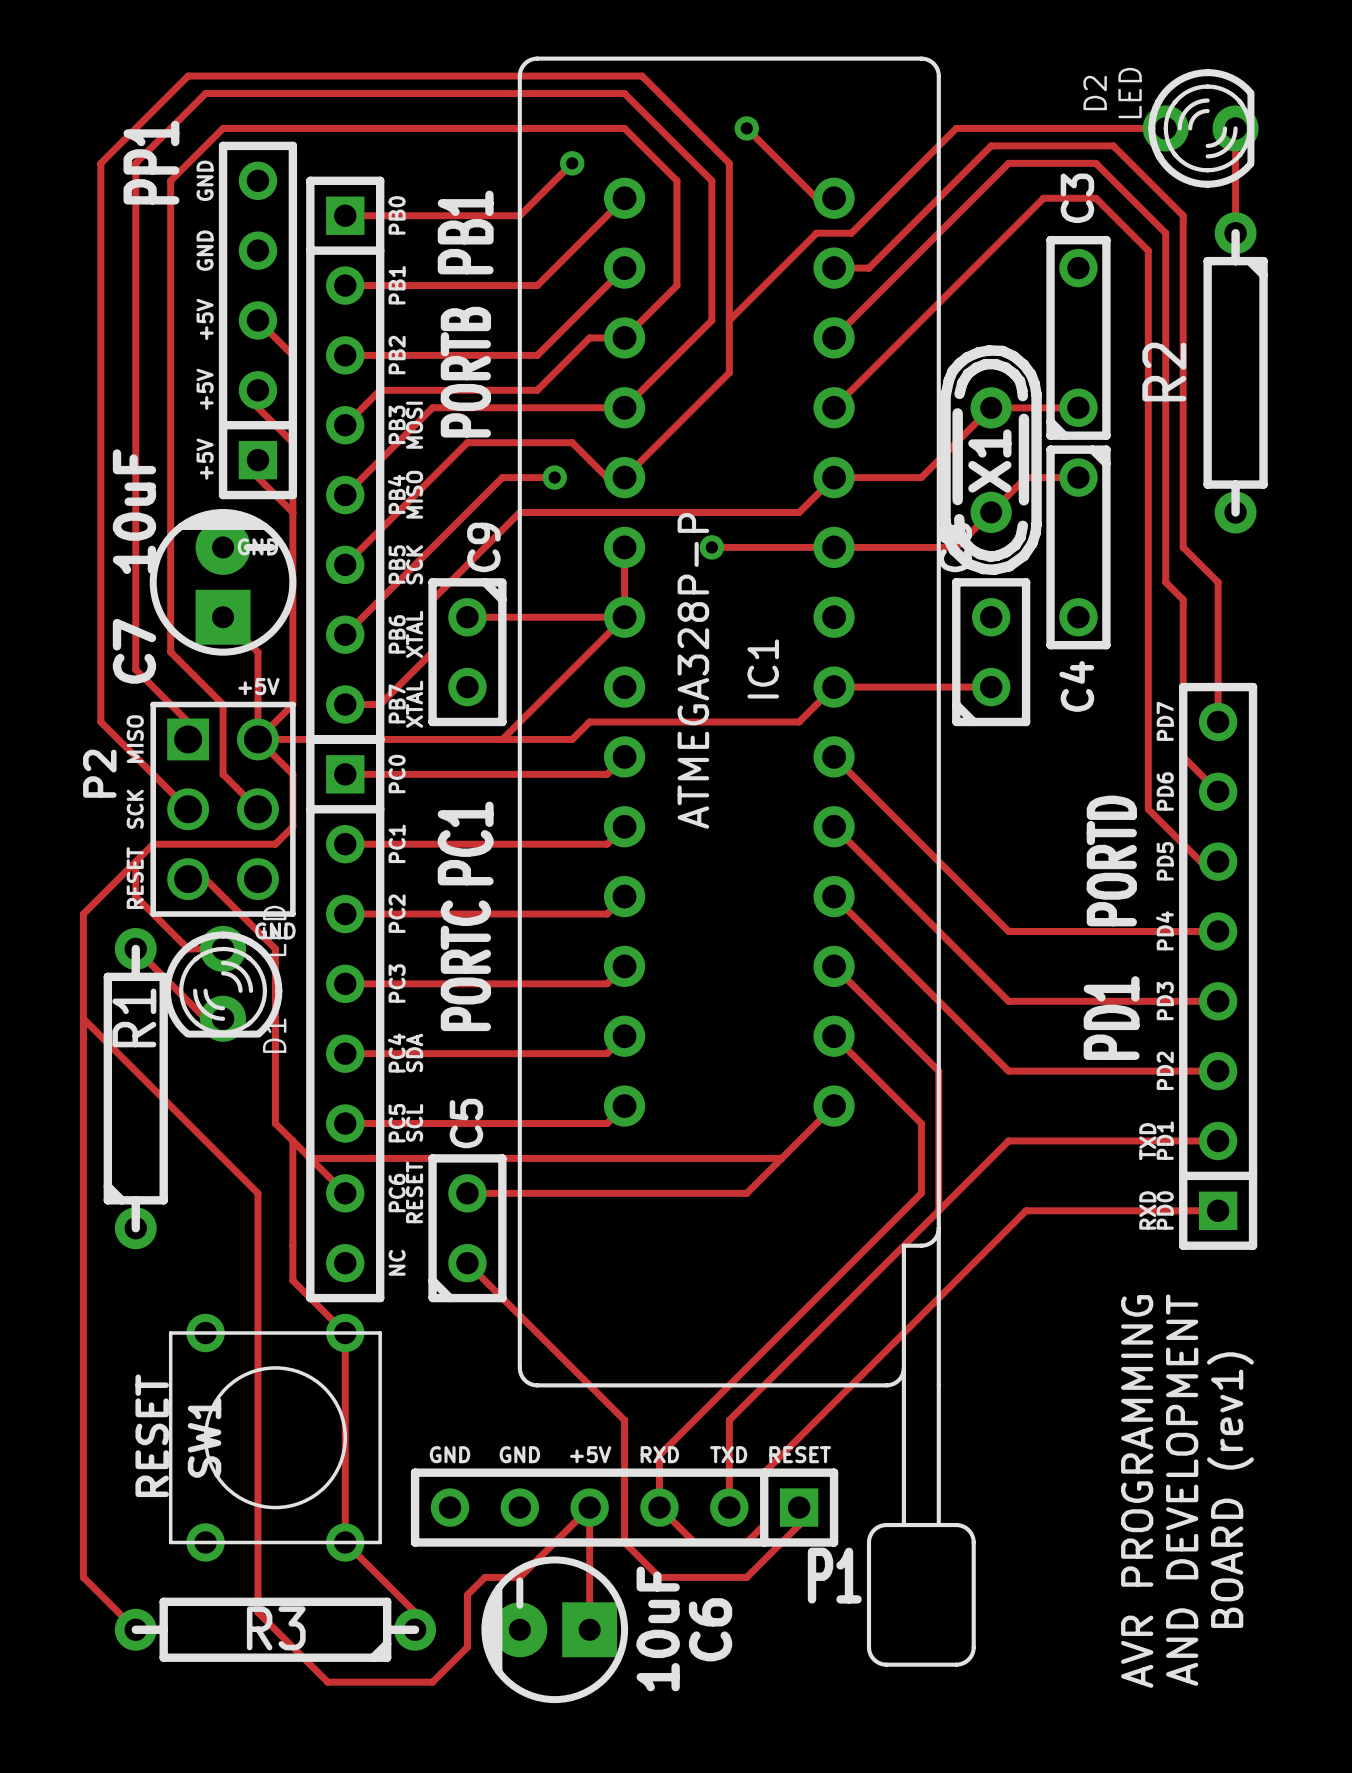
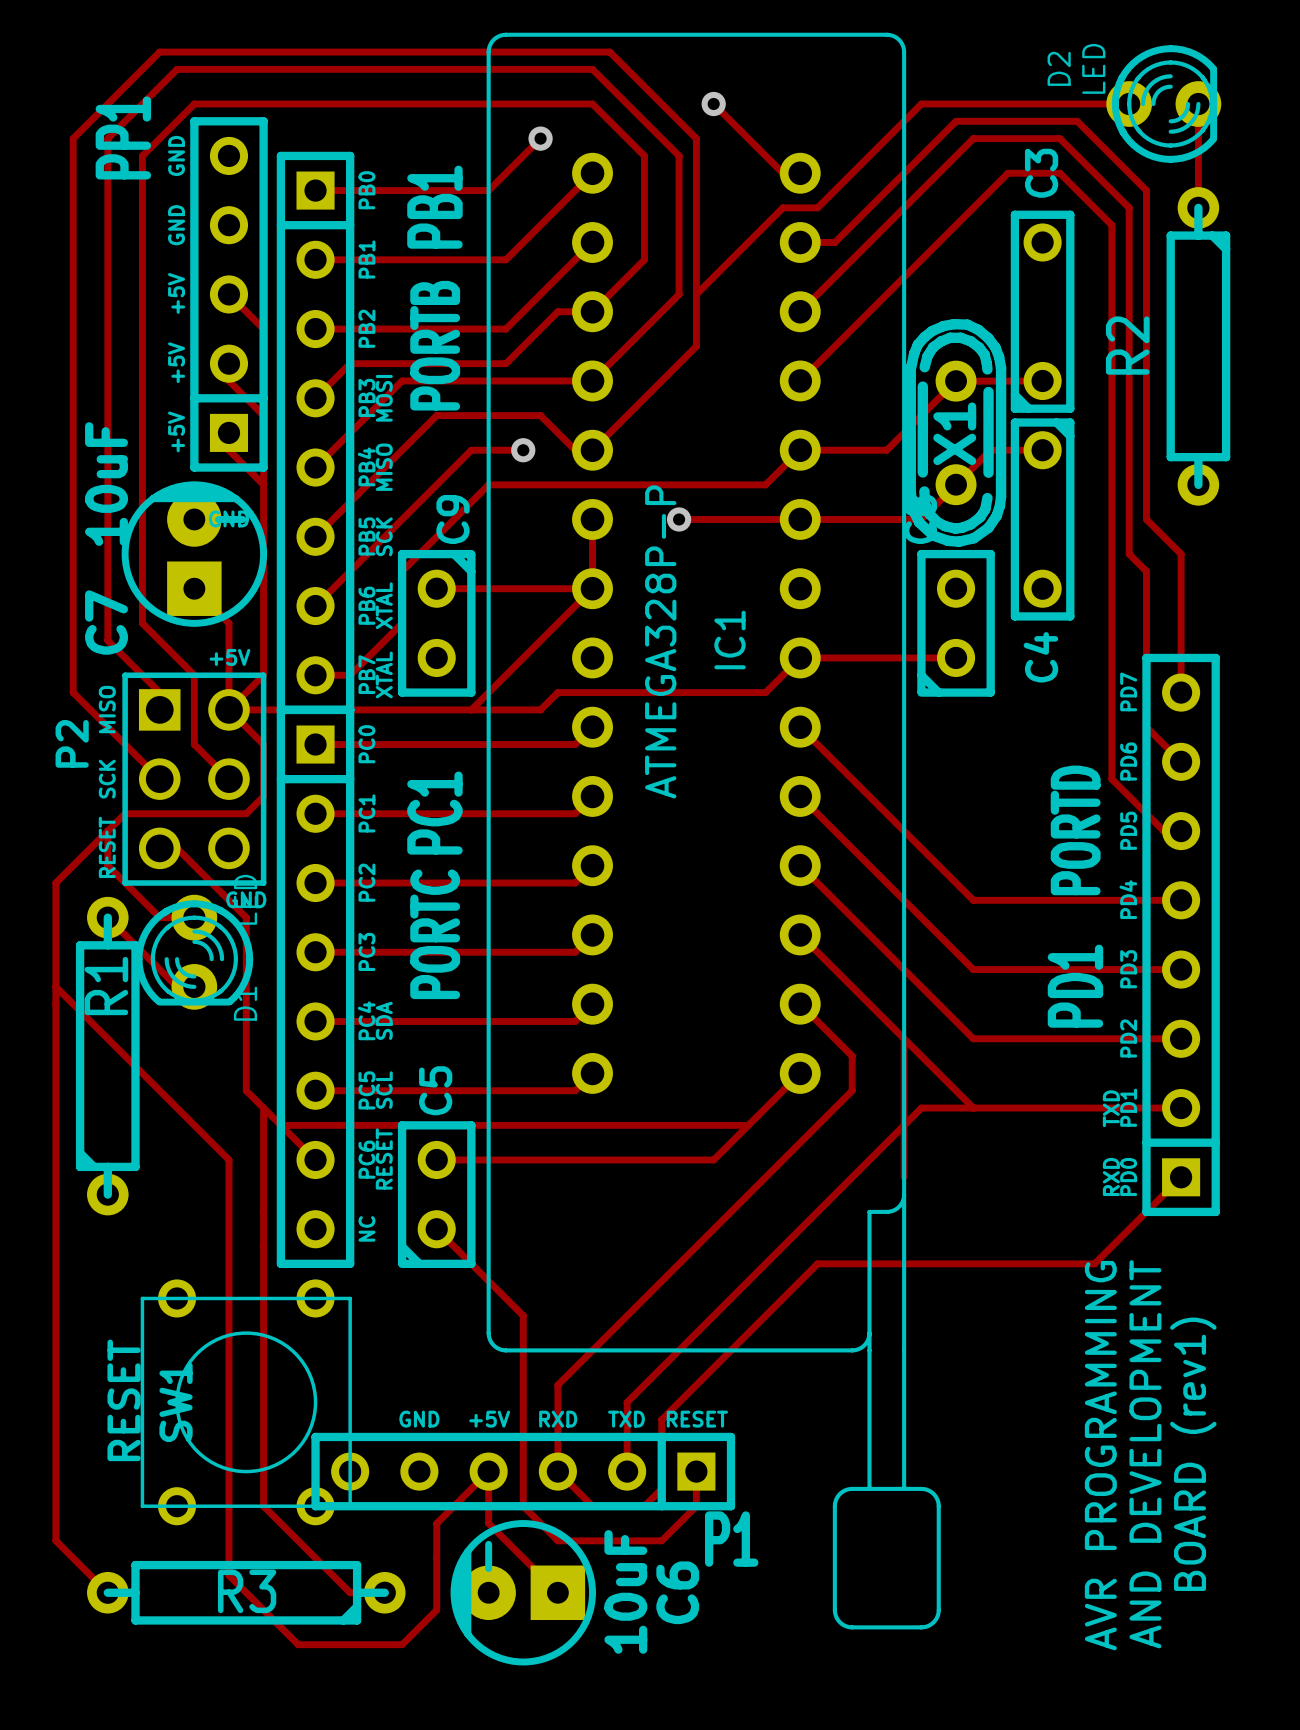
track: (886, 1088) (921, 1123) (921, 1193) (659, 1455) -> (904, 1038) (973, 1108) (921, 1108) (627, 1402) (627, 1419)
track: (1008, 1140) (851, 1298) -> (1181, 1177) (1094, 1263) (817, 1263)
track: (1218, 1210) (1026, 1210) (764, 1472) (764, 1525) (746, 1542) (694, 1542) (659, 1507) -> none
track: (292, 1280) (345, 1333) (345, 1542) (415, 1612) (415, 1629) -> (263, 1246) (263, 1506) (350, 1592) (384, 1592)
track: (554, 1350) (624, 1420) (624, 1542) (659, 1577) -> (523, 1315) (523, 1506) (557, 1540) (627, 1540)
track: (729, 1420) (729, 1507) -> (696, 1385) (661, 1419) (661, 1488) (644, 1506) (592, 1506) (557, 1471) (557, 1385) (852, 1090) (852, 1056)
text: GND (519, 1454) -> +5V (489, 1419)
text: +5V (590, 1454) -> RXD (558, 1419)
text: RXD (659, 1454) -> TXD (626, 1419)
text: TXD (728, 1454) -> RESET (697, 1419)
text: RESET (800, 1454) -> none
P1 position: (624, 1507) -> (523, 1471)
track: (799, 1507) (799, 1525) (746, 1577) (694, 1577) -> (696, 1471) (696, 1506) (661, 1540)
track: (467, 1594) (484, 1577) (519, 1577) (589, 1507) (589, 1629) -> (436, 1558) (436, 1523) (488, 1471) (488, 1523) (557, 1592)

